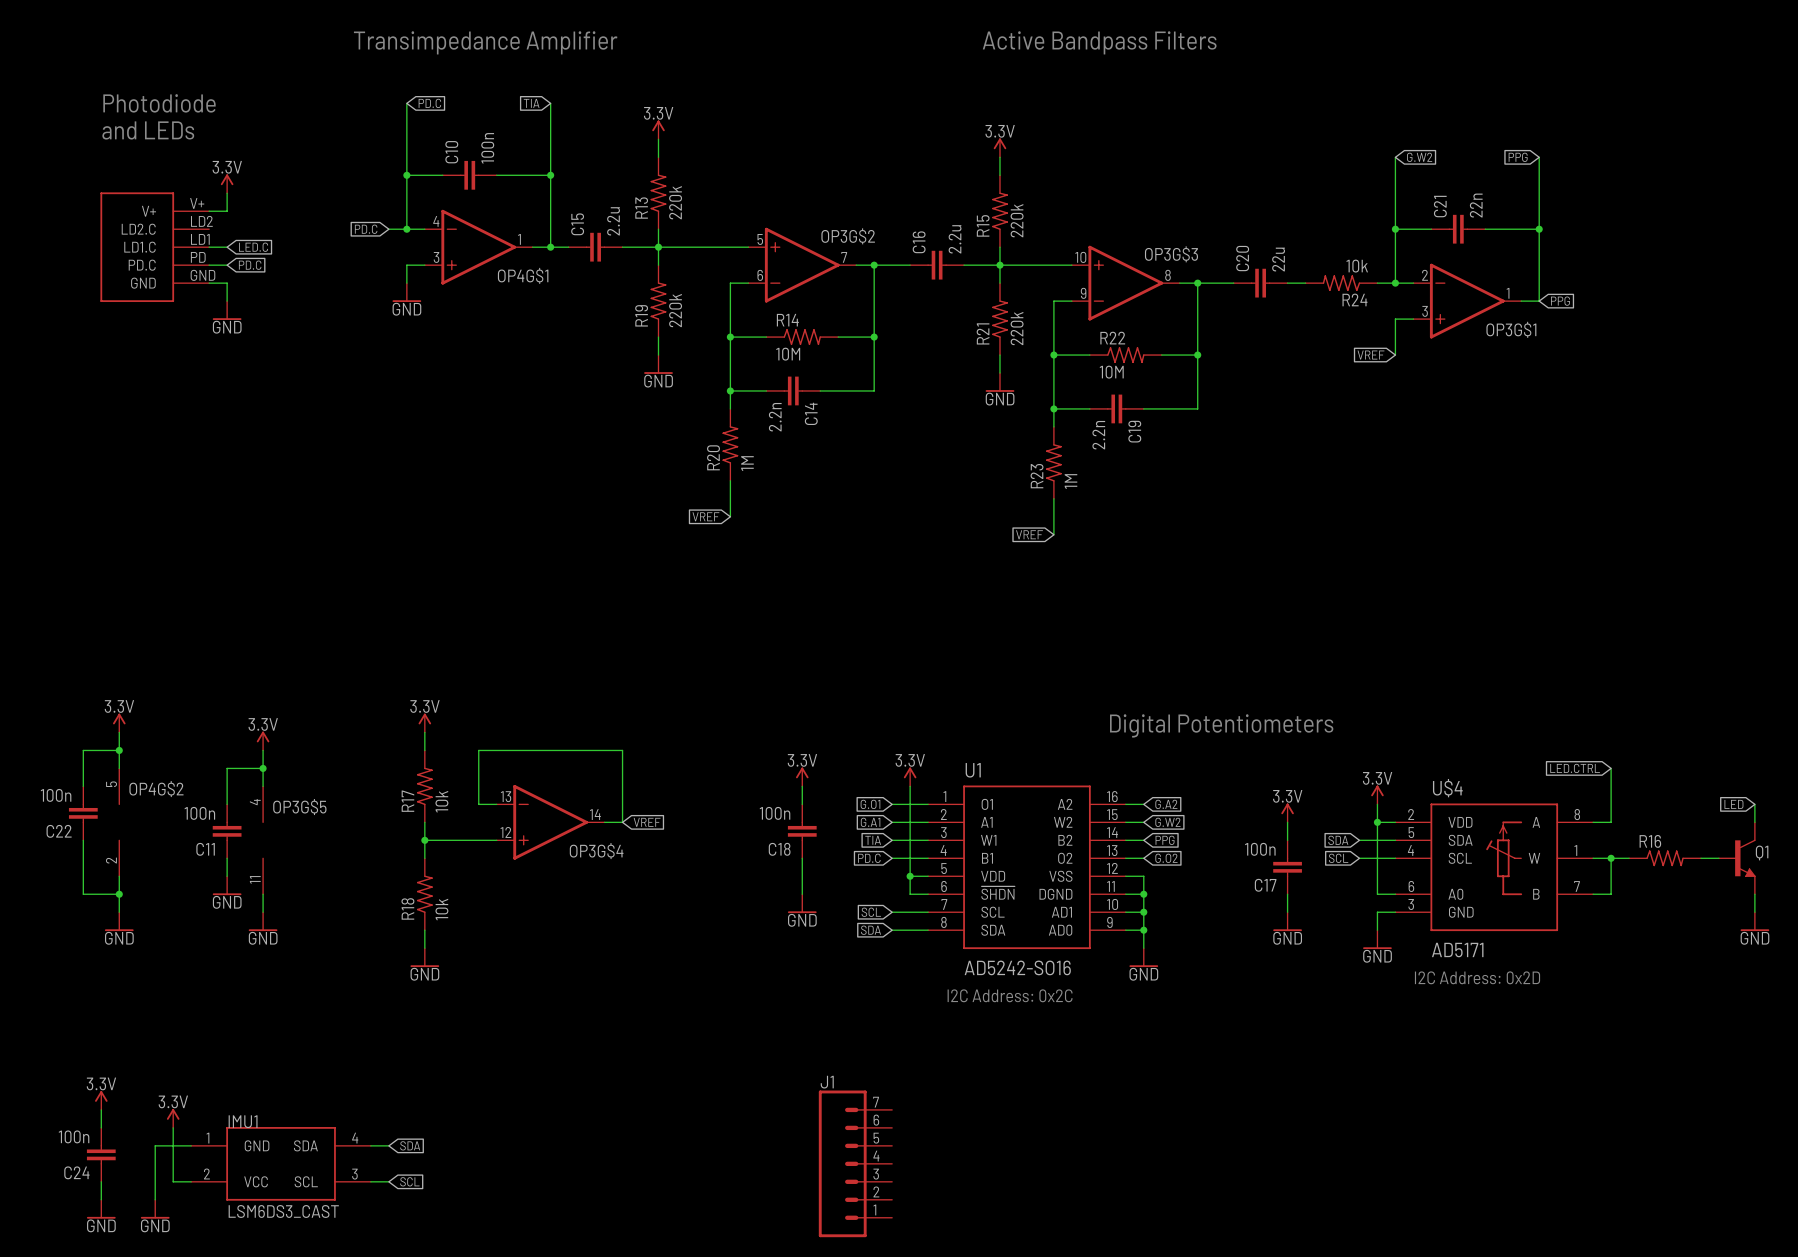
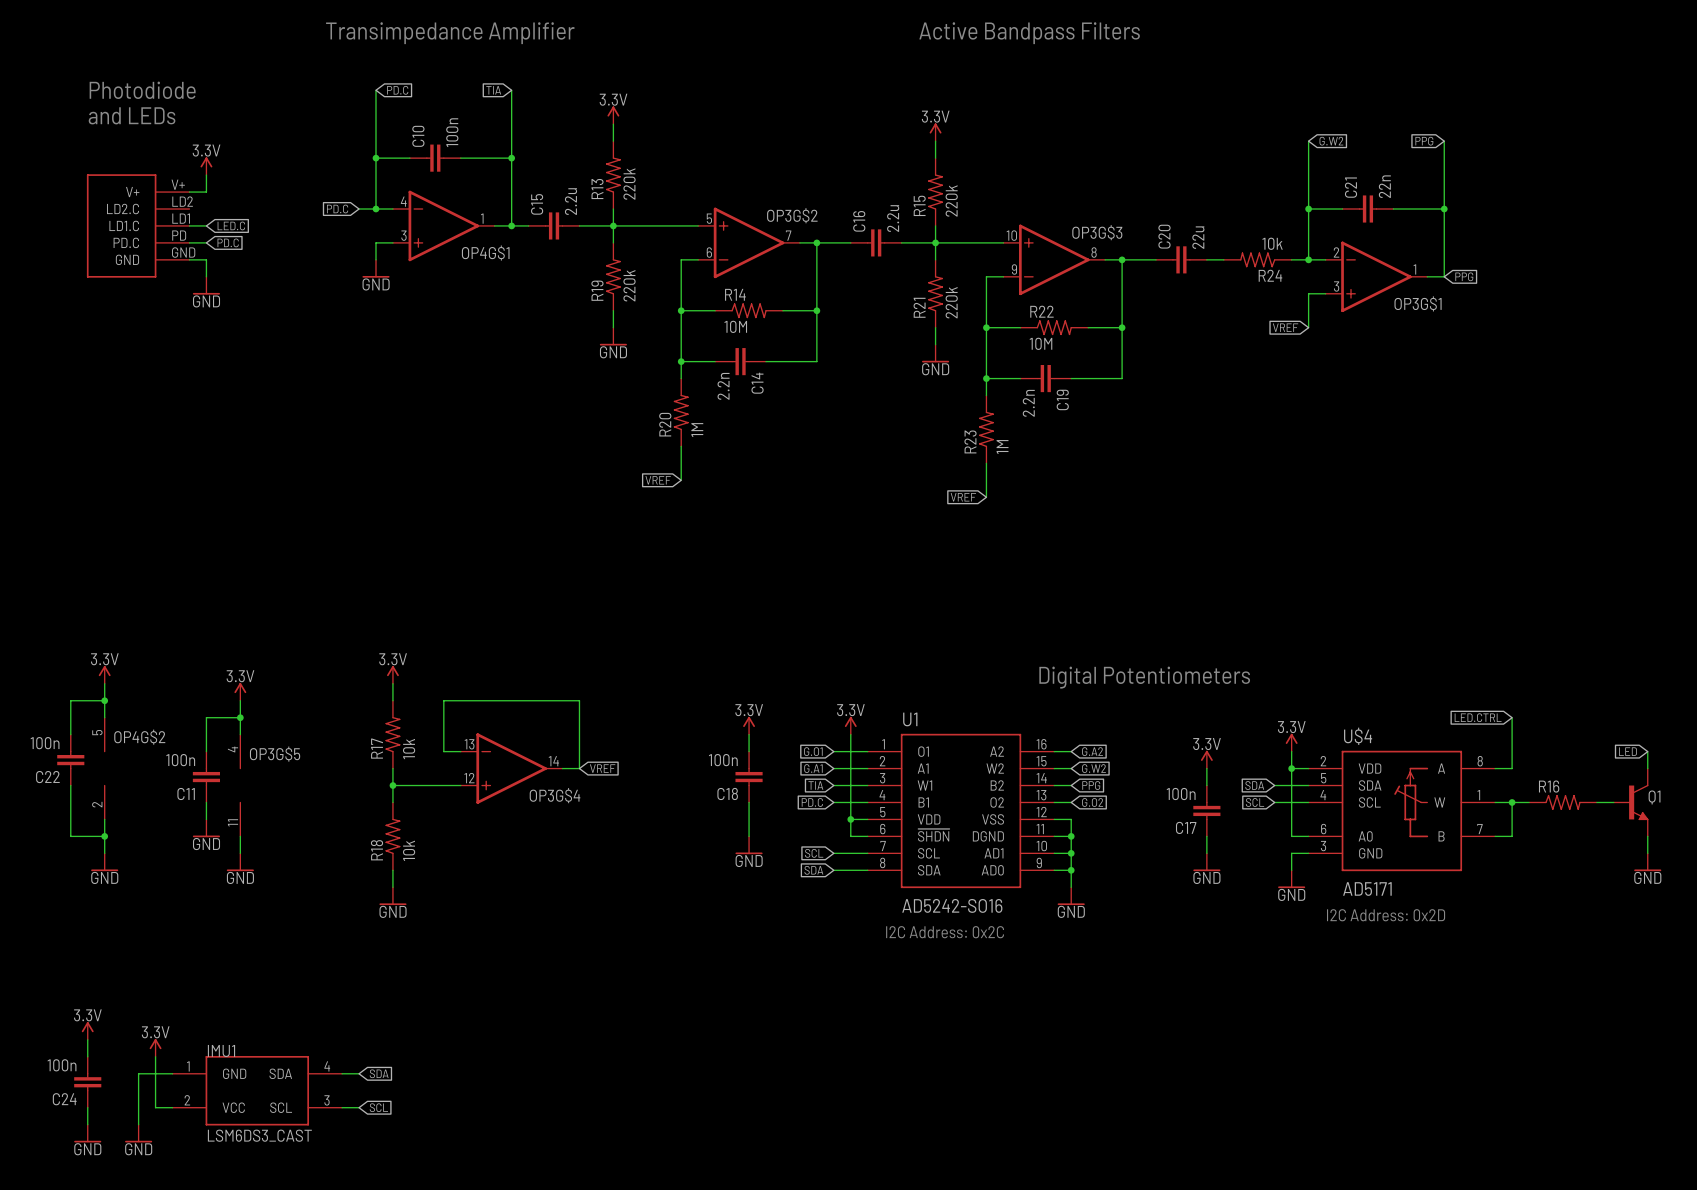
J1: (855, 1163) -> none

